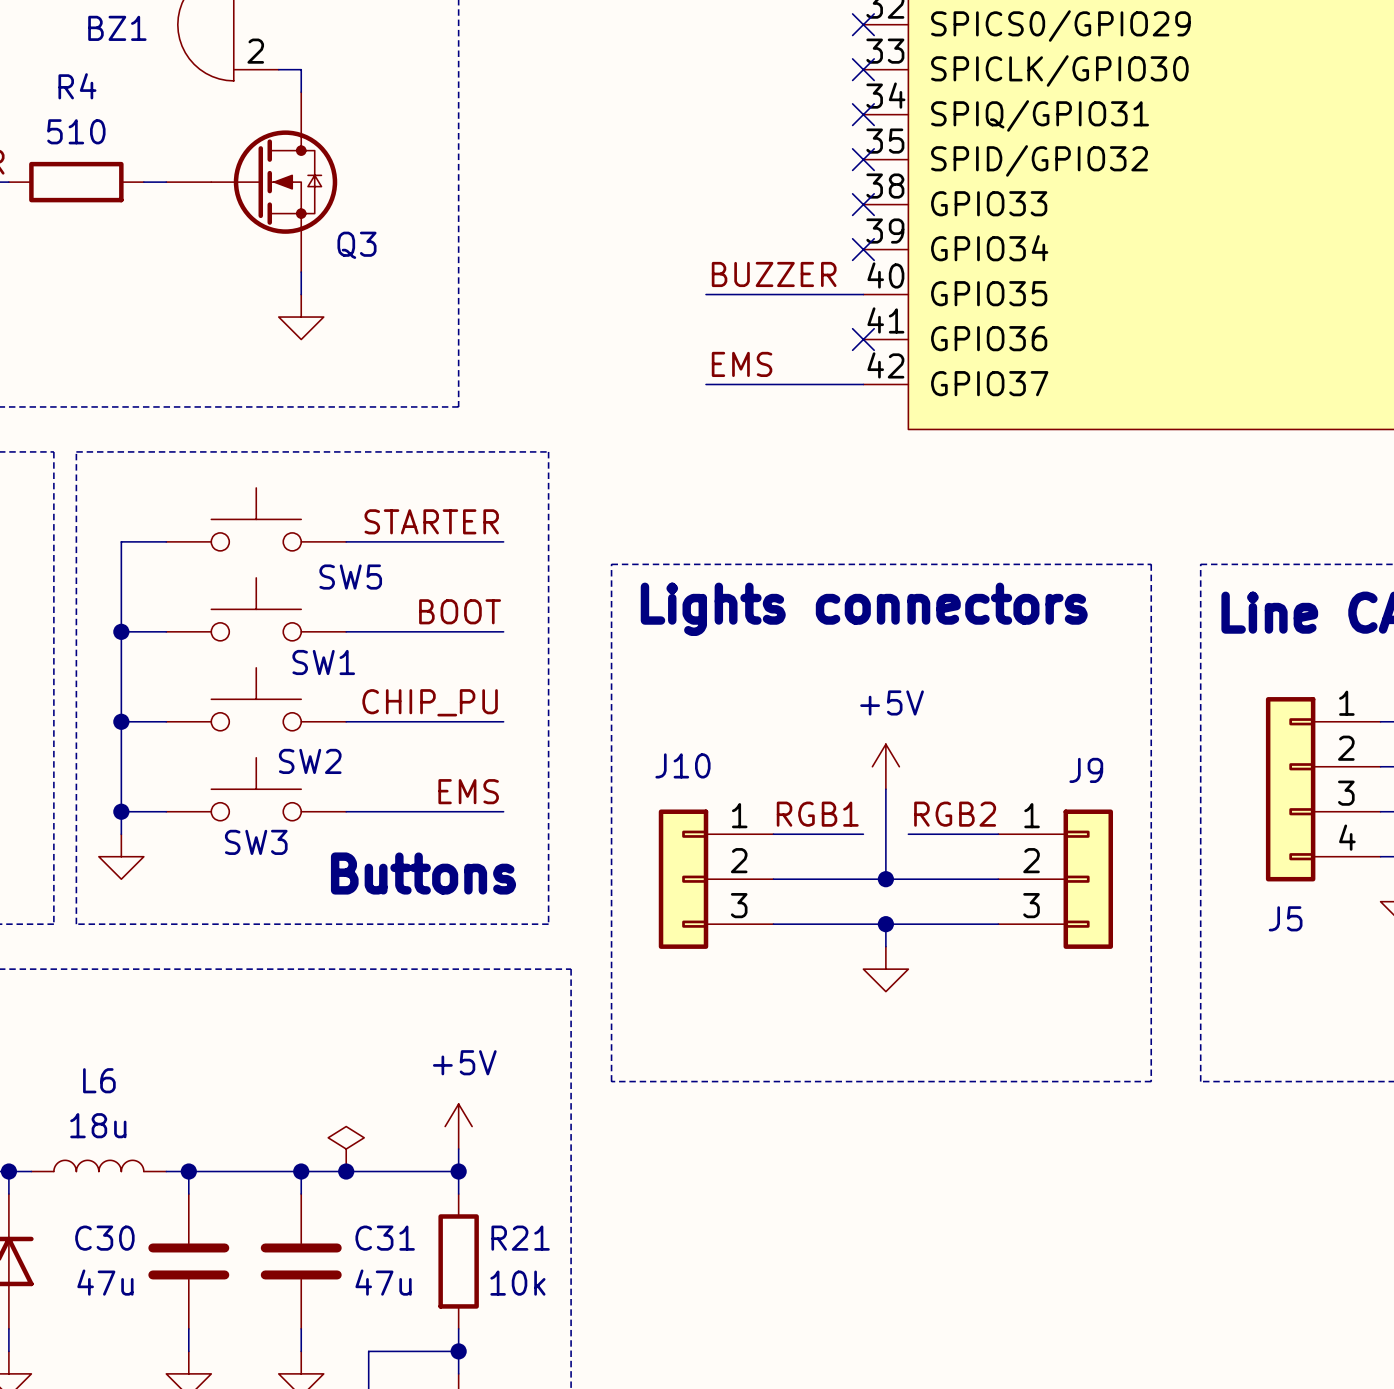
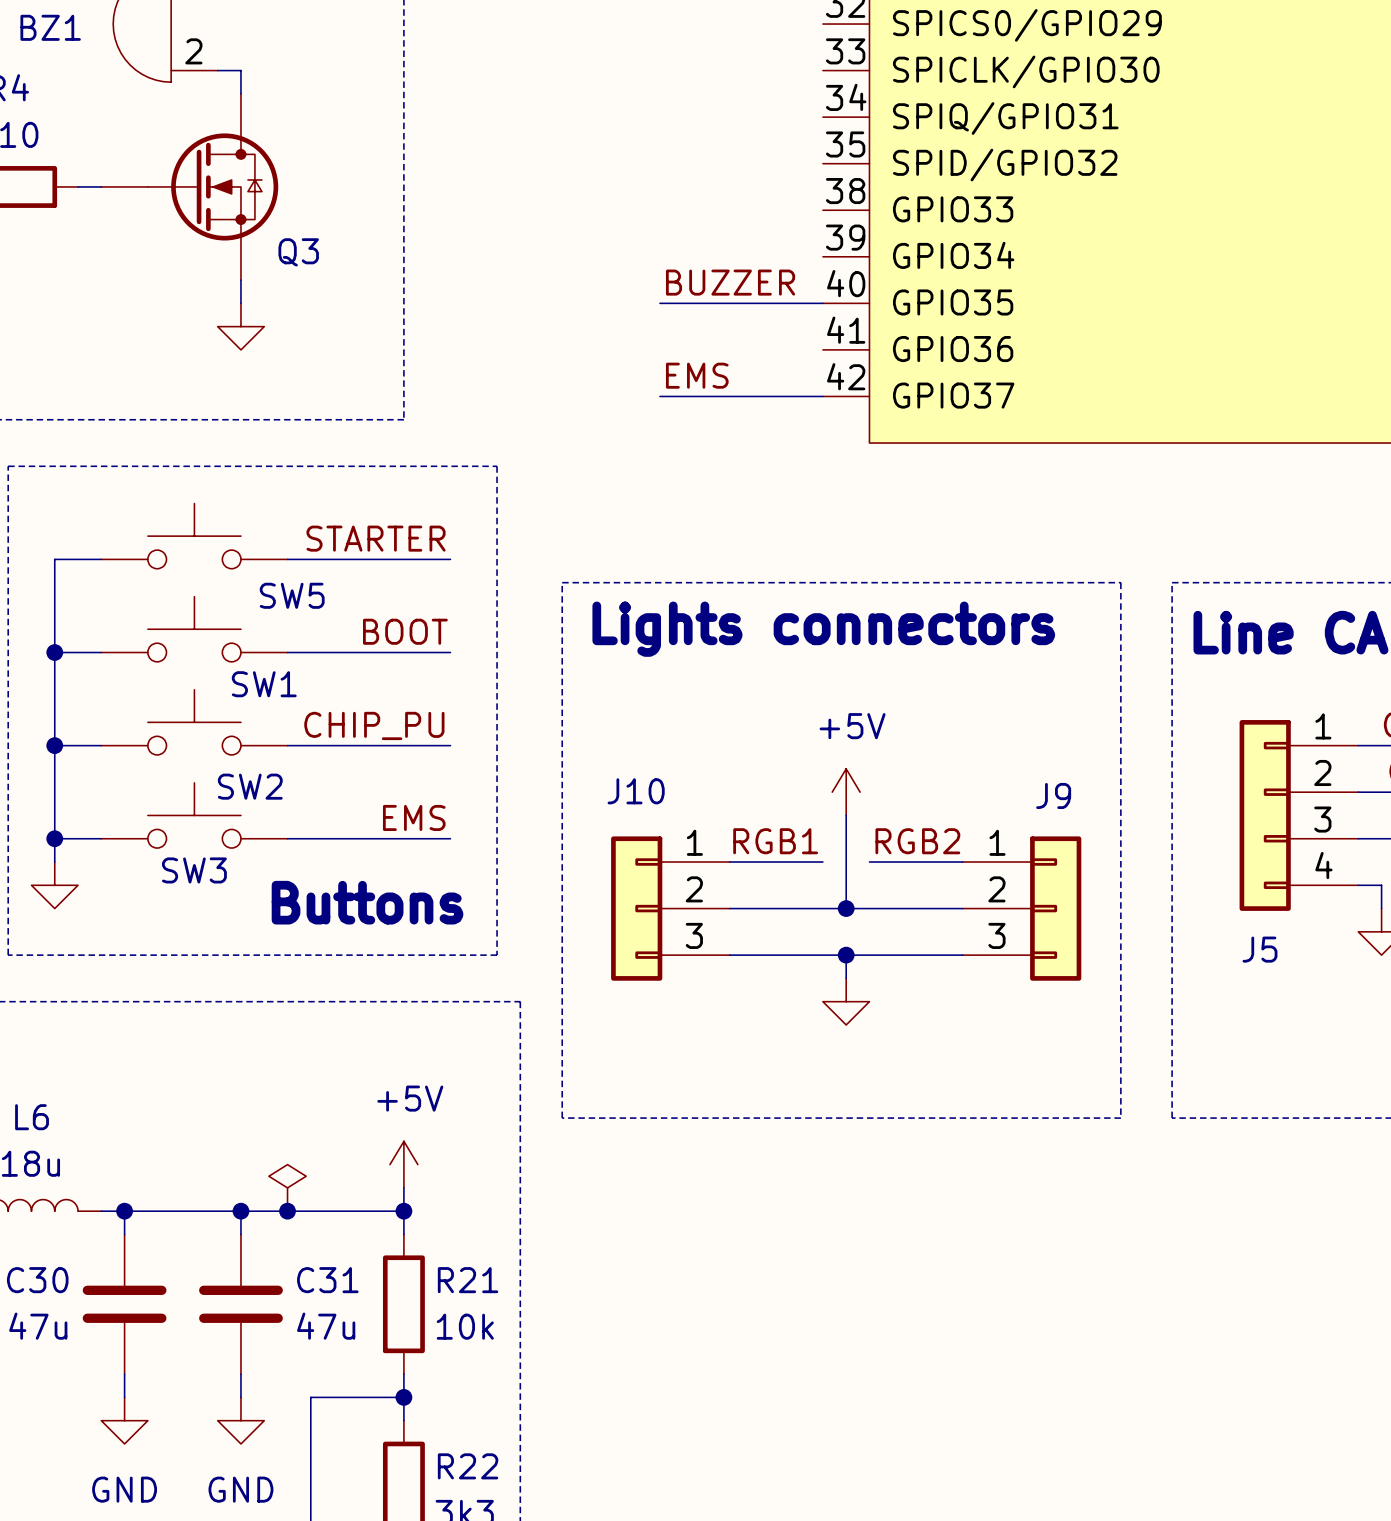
no-connect mark: (863, 24) -> none
no-connect mark: (863, 69) -> none
no-connect mark: (863, 114) -> none
no-connect mark: (863, 159) -> none
no-connect mark: (863, 204) -> none
no-connect mark: (863, 249) -> none
no-connect mark: (863, 339) -> none

